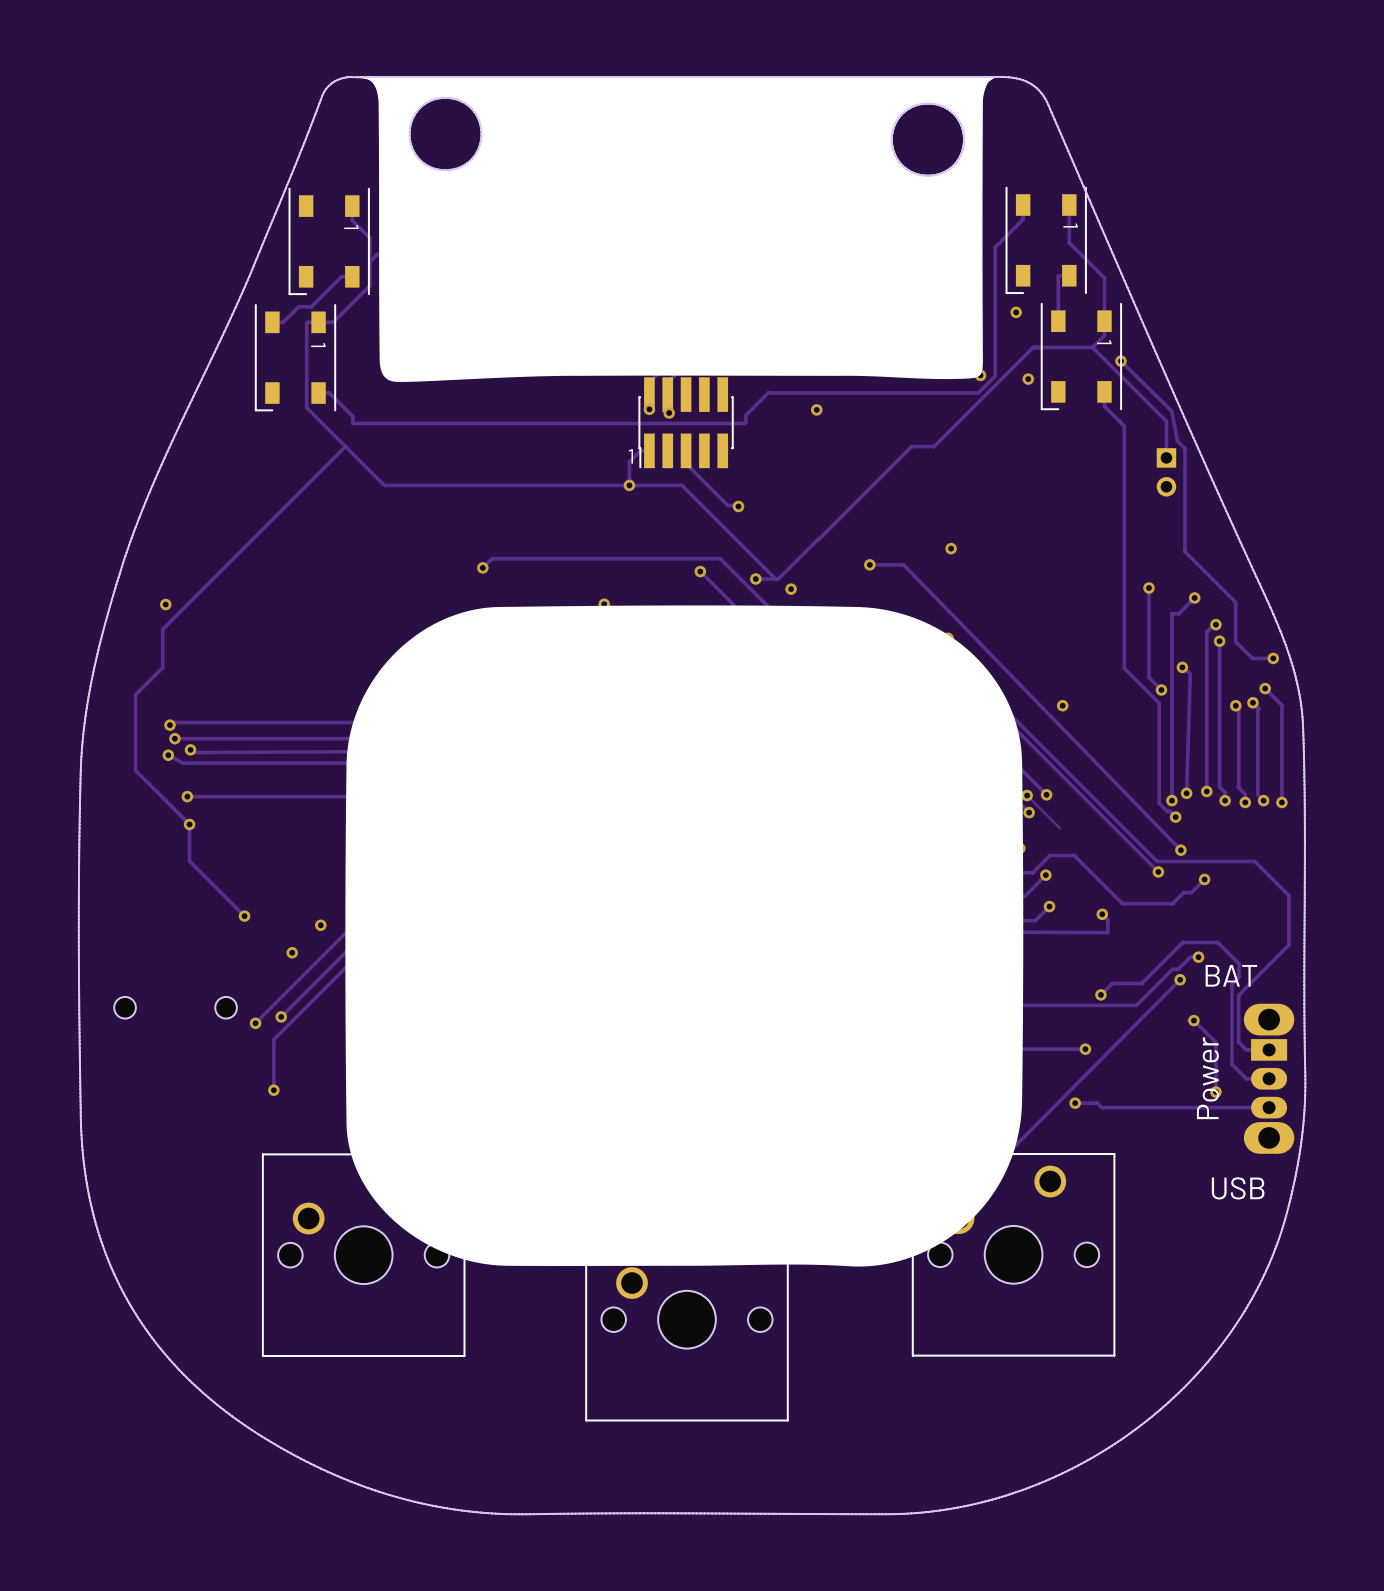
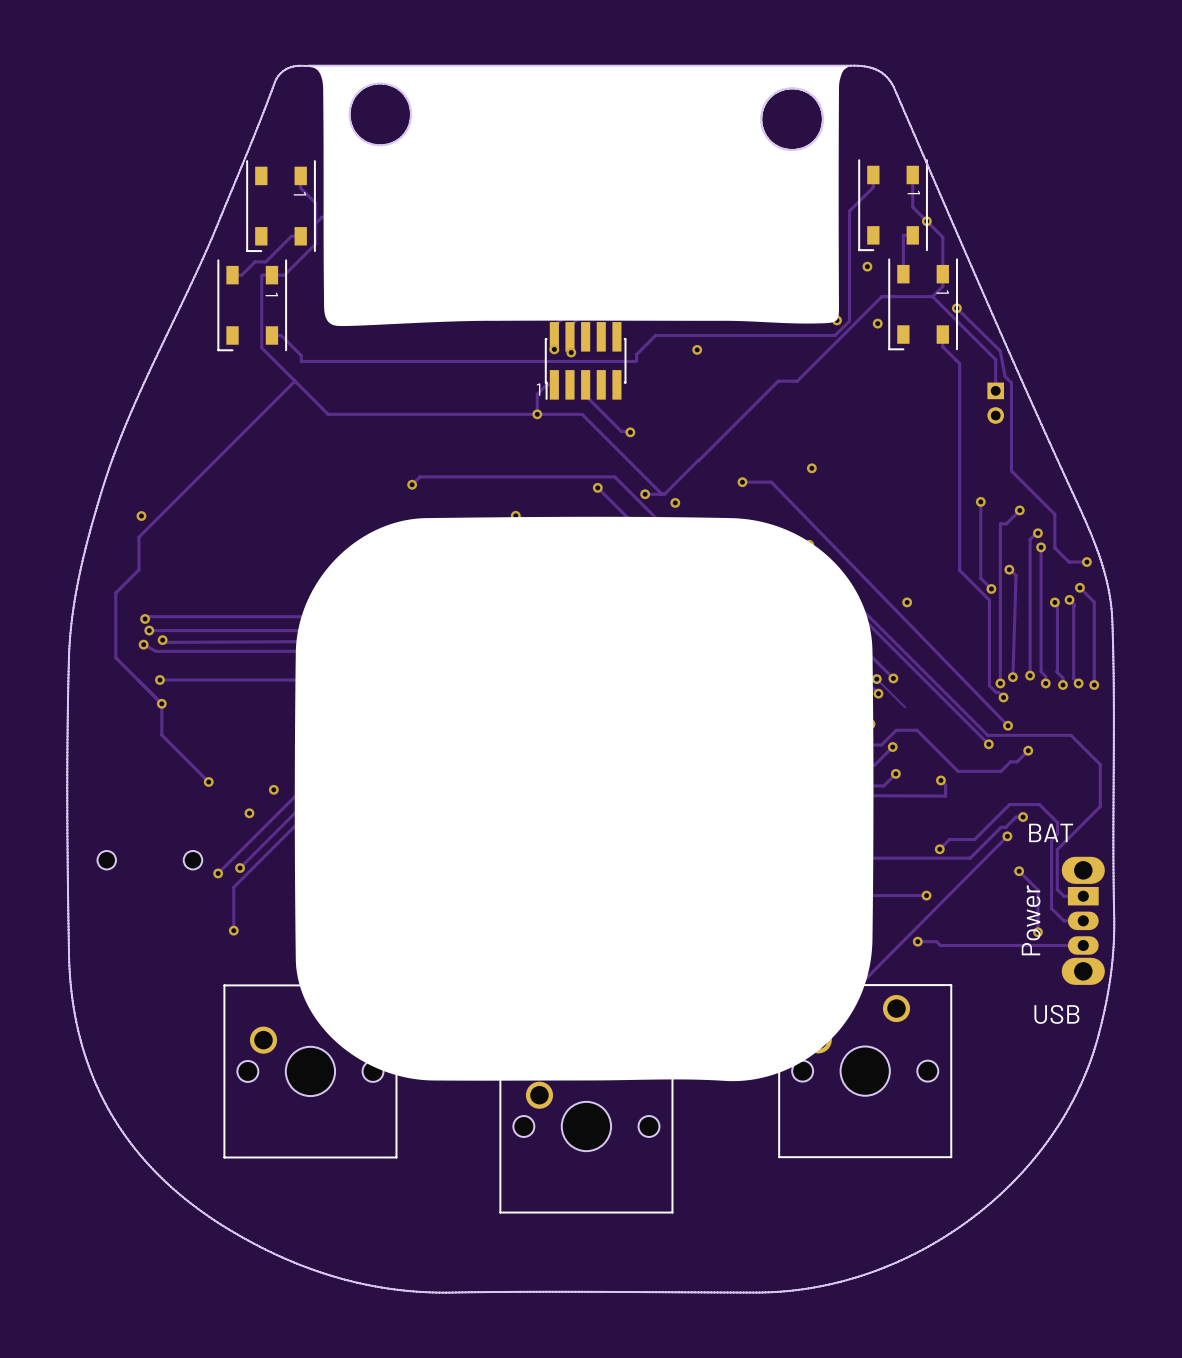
via: none -> (926, 221)

